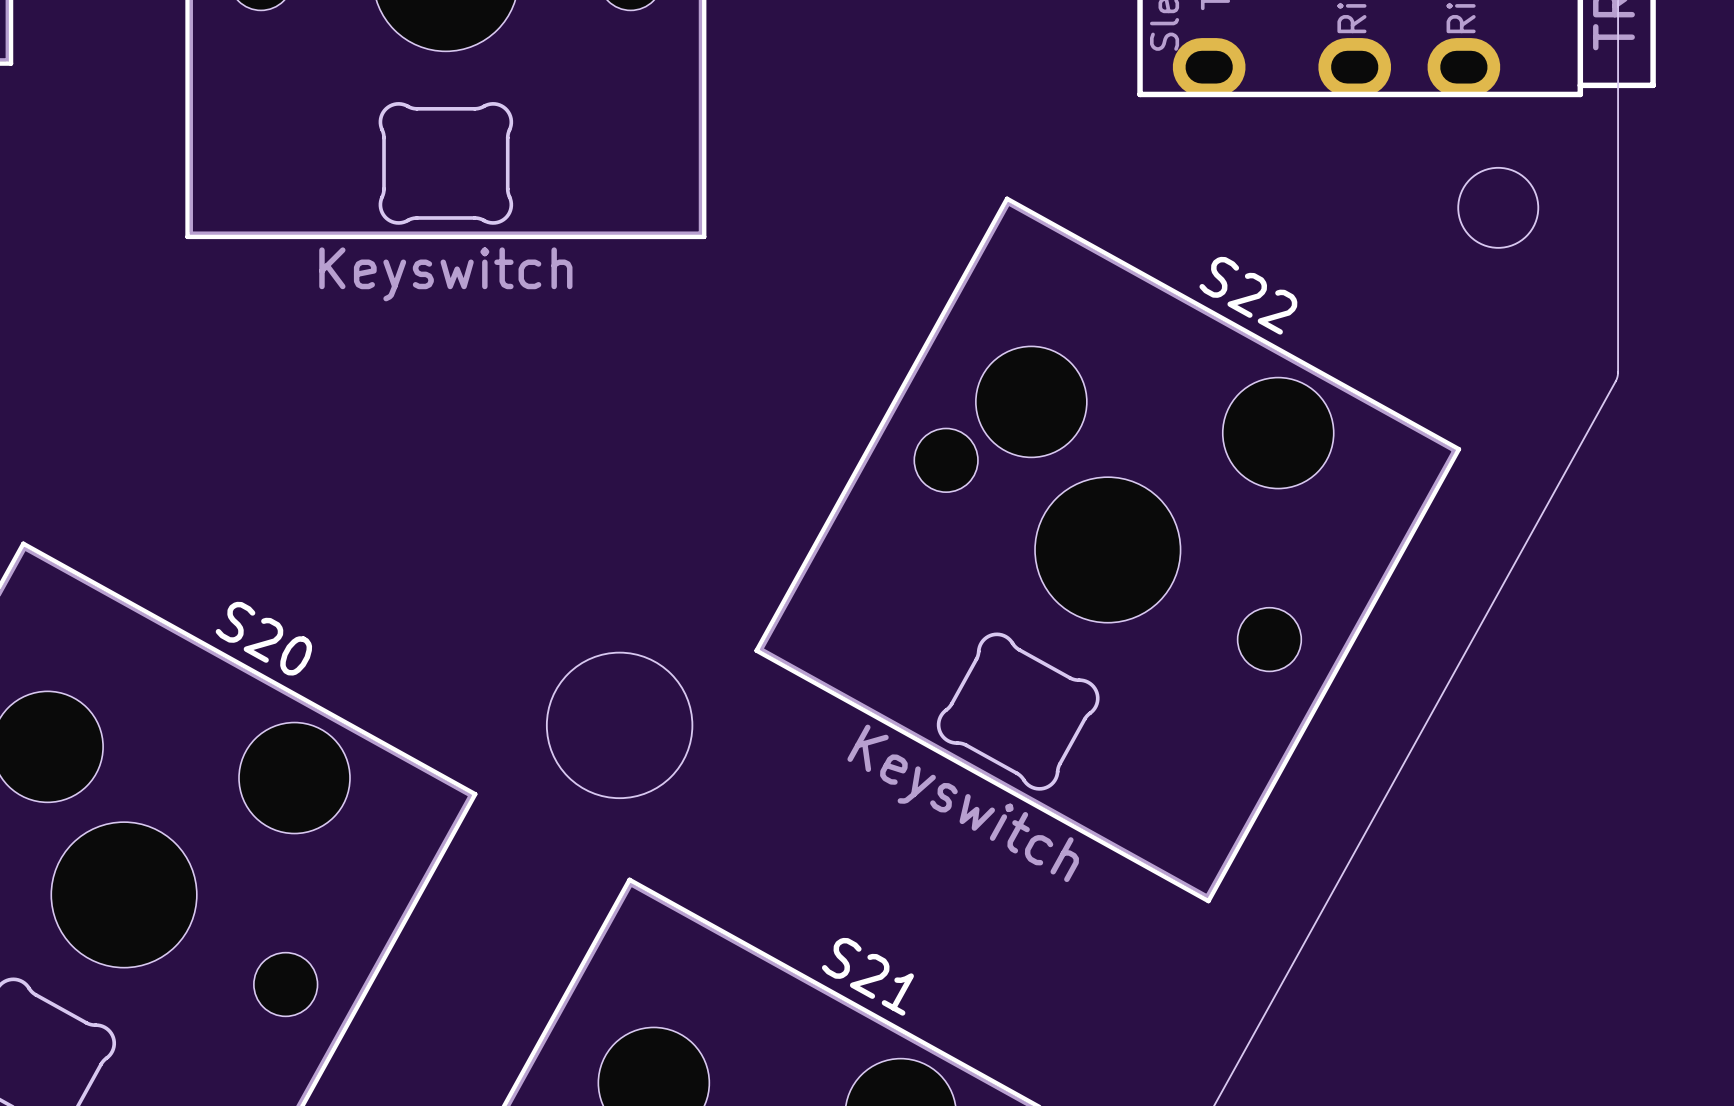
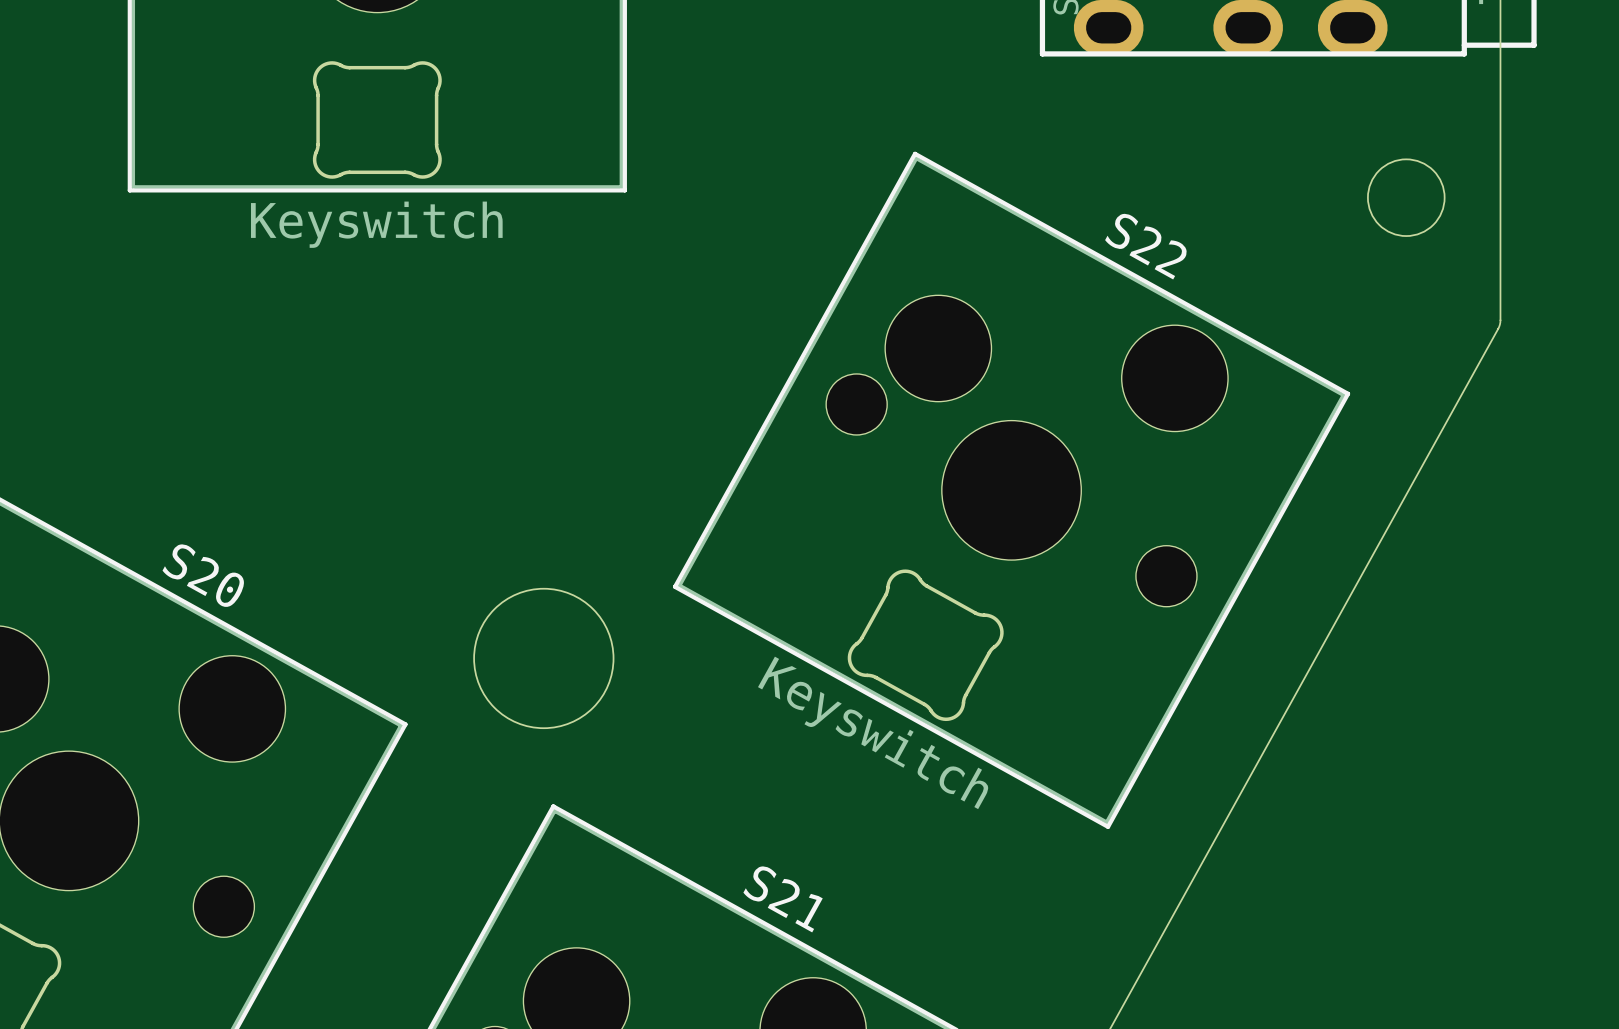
round board edge position: (1498, 207) -> (1406, 197)

